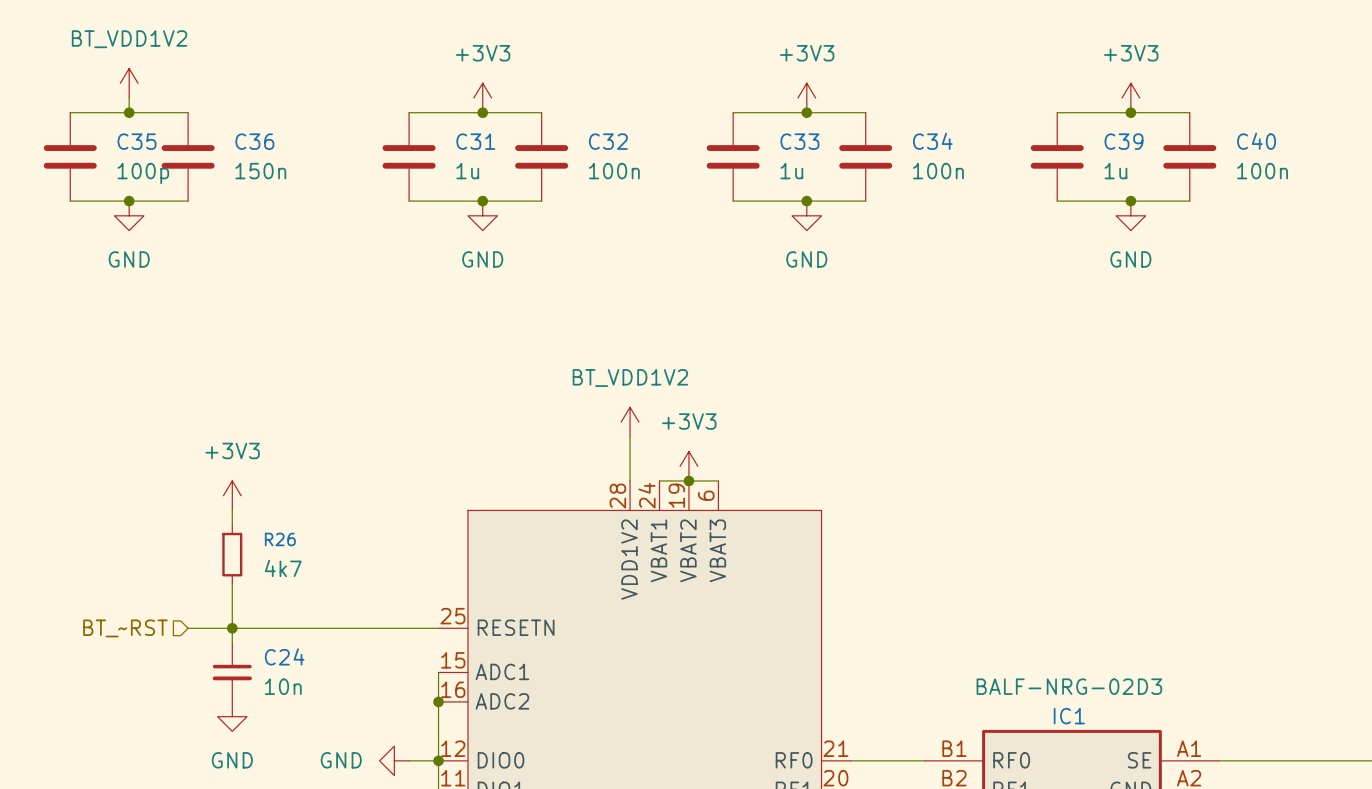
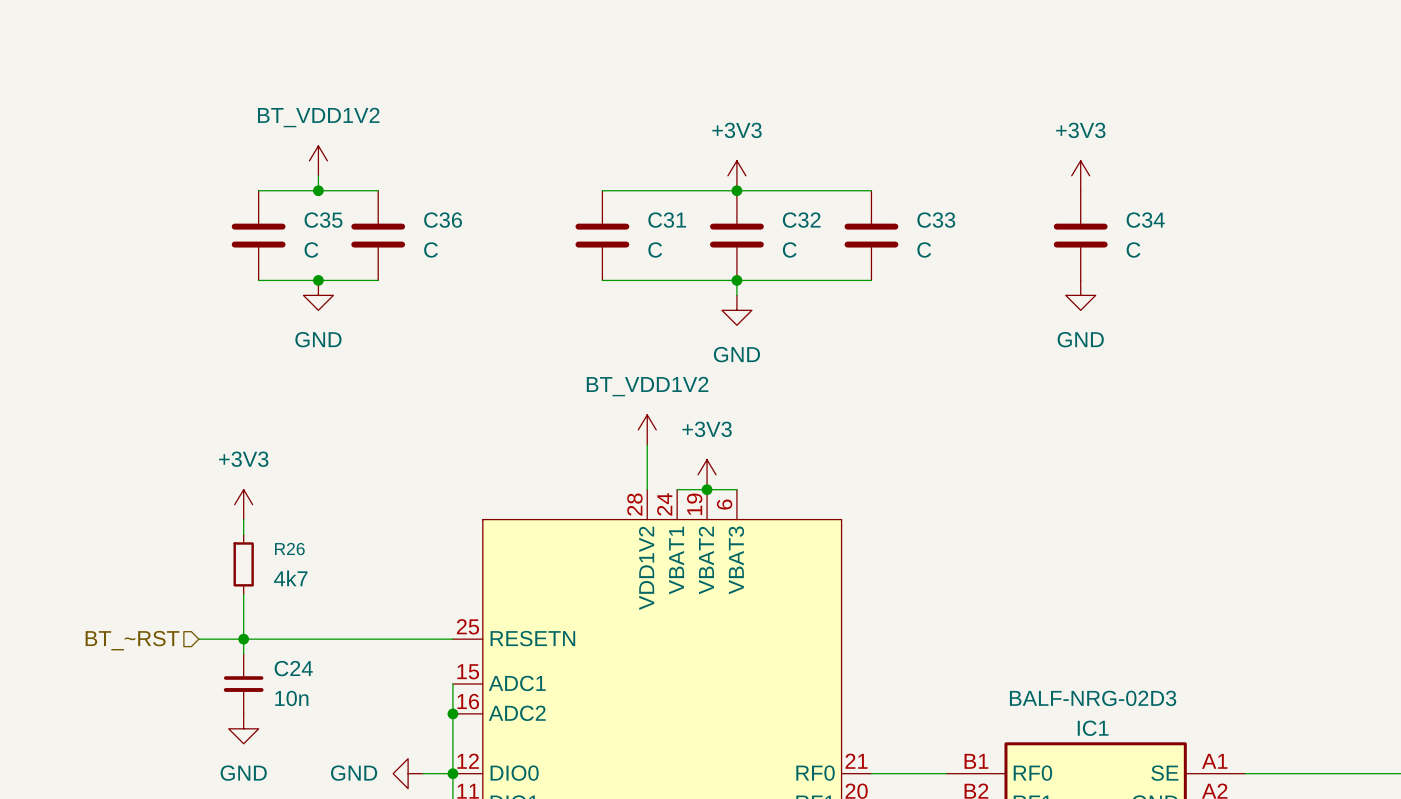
power symbol position: BT_VDD1V2 (129, 83) -> BT_VDD1V2 (318, 160)
wire: (129, 97) (129, 112) -> (318, 175) (318, 190)
power symbol: +3V3 (482, 97) -> none
power symbol position: +3V3 (806, 97) -> +3V3 (736, 175)
power symbol position: +3V3 (1130, 97) -> +3V3 (1080, 175)
wire: (70, 112) (188, 112) -> (258, 190) (378, 190)
junction: (129, 112) -> none
wire: (409, 112) (541, 112) -> none
junction: (482, 112) -> none
wire: (733, 112) (865, 112) -> none
junction: (806, 112) -> none
wire: (1057, 112) (1189, 112) -> none
junction: (1130, 112) -> none
C35 position: (70, 156) -> (258, 235)
C36 position: (188, 156) -> (378, 235)
C31 position: (409, 156) -> (602, 235)
C32 position: (541, 156) -> (736, 235)
C33 position: (733, 156) -> (871, 235)
C34 position: (865, 156) -> (1080, 235)
C39: 1u (1057, 156) -> none
C40: 100n (1189, 156) -> none
C36 value: 150n (260, 171) -> C (431, 249)
C31 value: 1u (467, 171) -> C (655, 249)
C32 value: 100n (614, 171) -> C (789, 249)
C33 value: 1u (791, 171) -> C (924, 249)
C34 value: 100n (938, 171) -> C (1133, 249)
C35 value: 100p (143, 173) -> C (311, 249)
junction: none -> (318, 190)
wire: none -> (602, 190) (871, 190)
junction: none -> (736, 190)
wire: (70, 201) (188, 201) -> (258, 280) (378, 280)
junction: (129, 201) -> none
wire: (409, 201) (541, 201) -> none
junction: (482, 201) -> none
wire: (733, 201) (865, 201) -> none
junction: (806, 201) -> none
wire: (1057, 201) (1189, 201) -> none
junction: (1130, 201) -> none
power symbol: GND (129, 215) -> none
power symbol: GND (482, 215) -> none
power symbol position: GND (806, 215) -> GND (736, 310)
power symbol position: GND (1130, 215) -> GND (1080, 295)
junction: none -> (318, 280)
wire: none -> (602, 280) (871, 280)
wire: none -> (736, 280) (736, 295)
junction: none -> (736, 280)
power symbol: none -> GND (318, 295)

